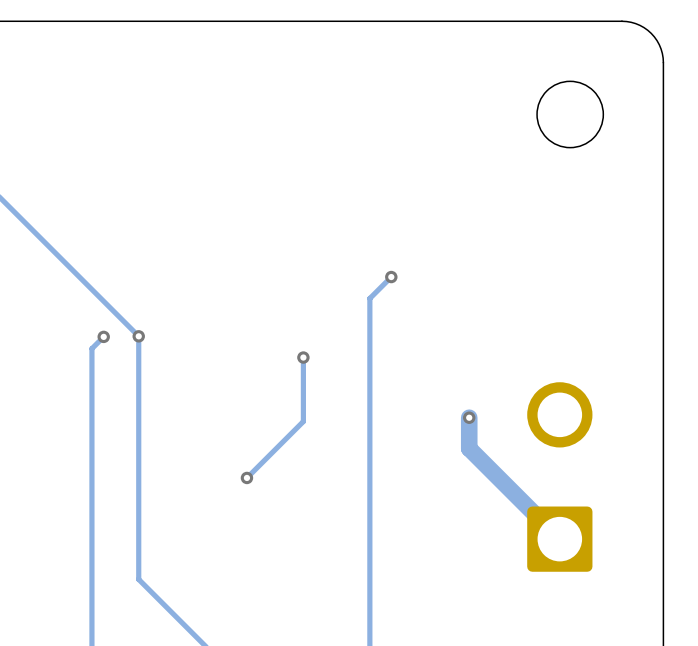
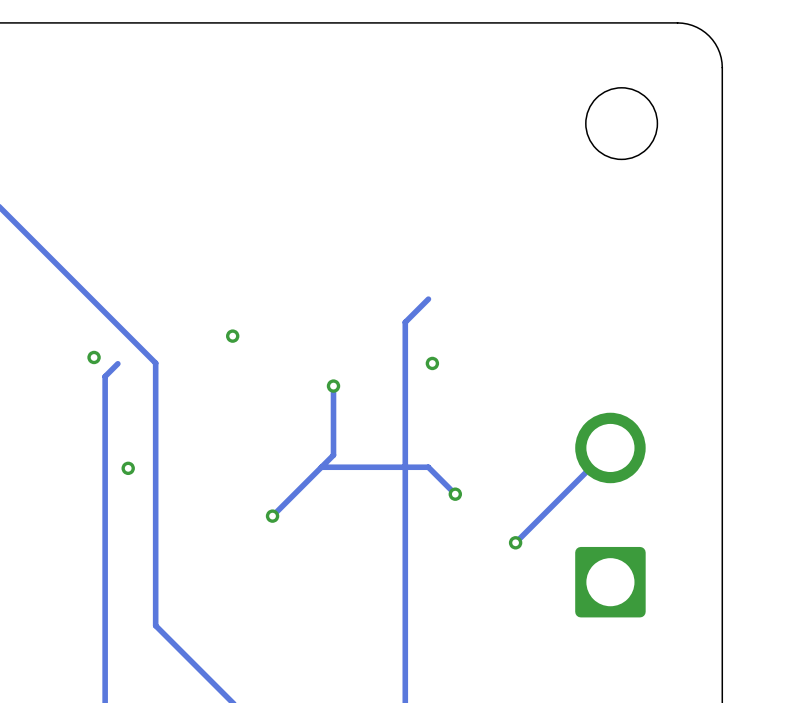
via: (391, 277) -> none
via: none -> (232, 336)
via position: (103, 336) -> (94, 357)
via: (138, 336) -> none
via: none -> (432, 363)
track: none -> (610, 447) (515, 542)
track: (469, 417) (469, 448) (559, 539) -> none
via: (469, 417) -> none
track: none -> (321, 467) (428, 467) (455, 494)
via: none -> (128, 468)
via: none -> (455, 494)
via: none -> (515, 542)

